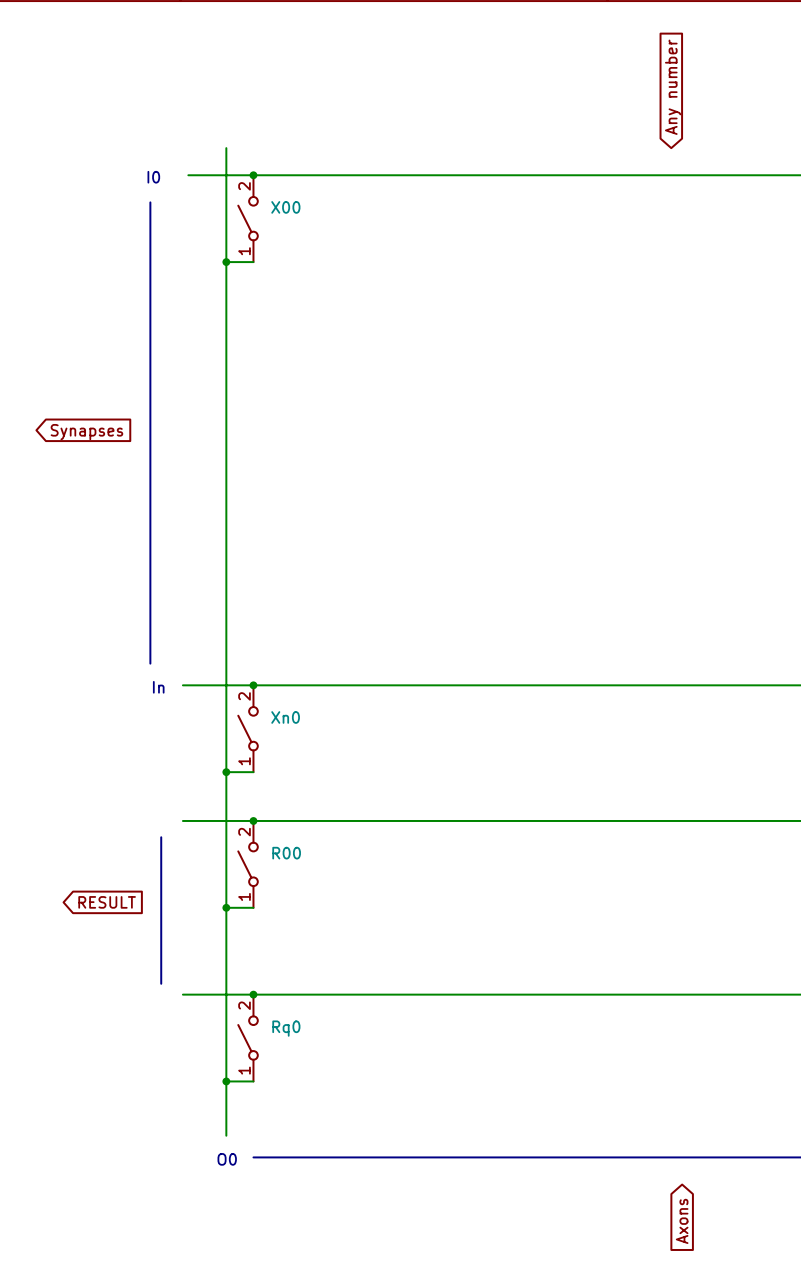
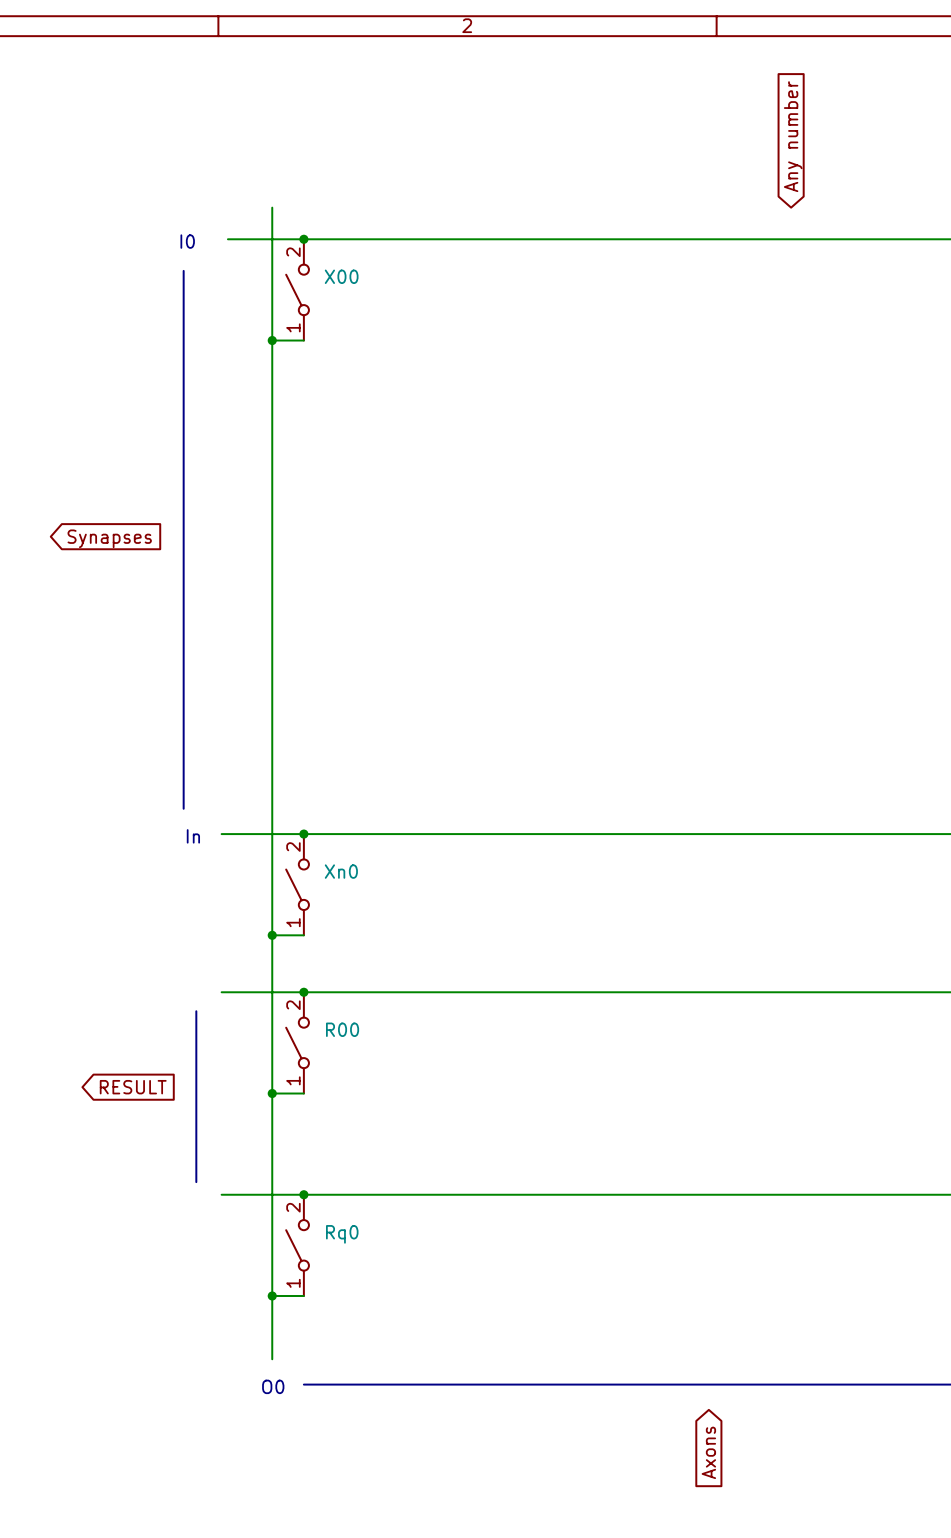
global label position: Axons (682, 1221) -> Axons (708, 1452)

